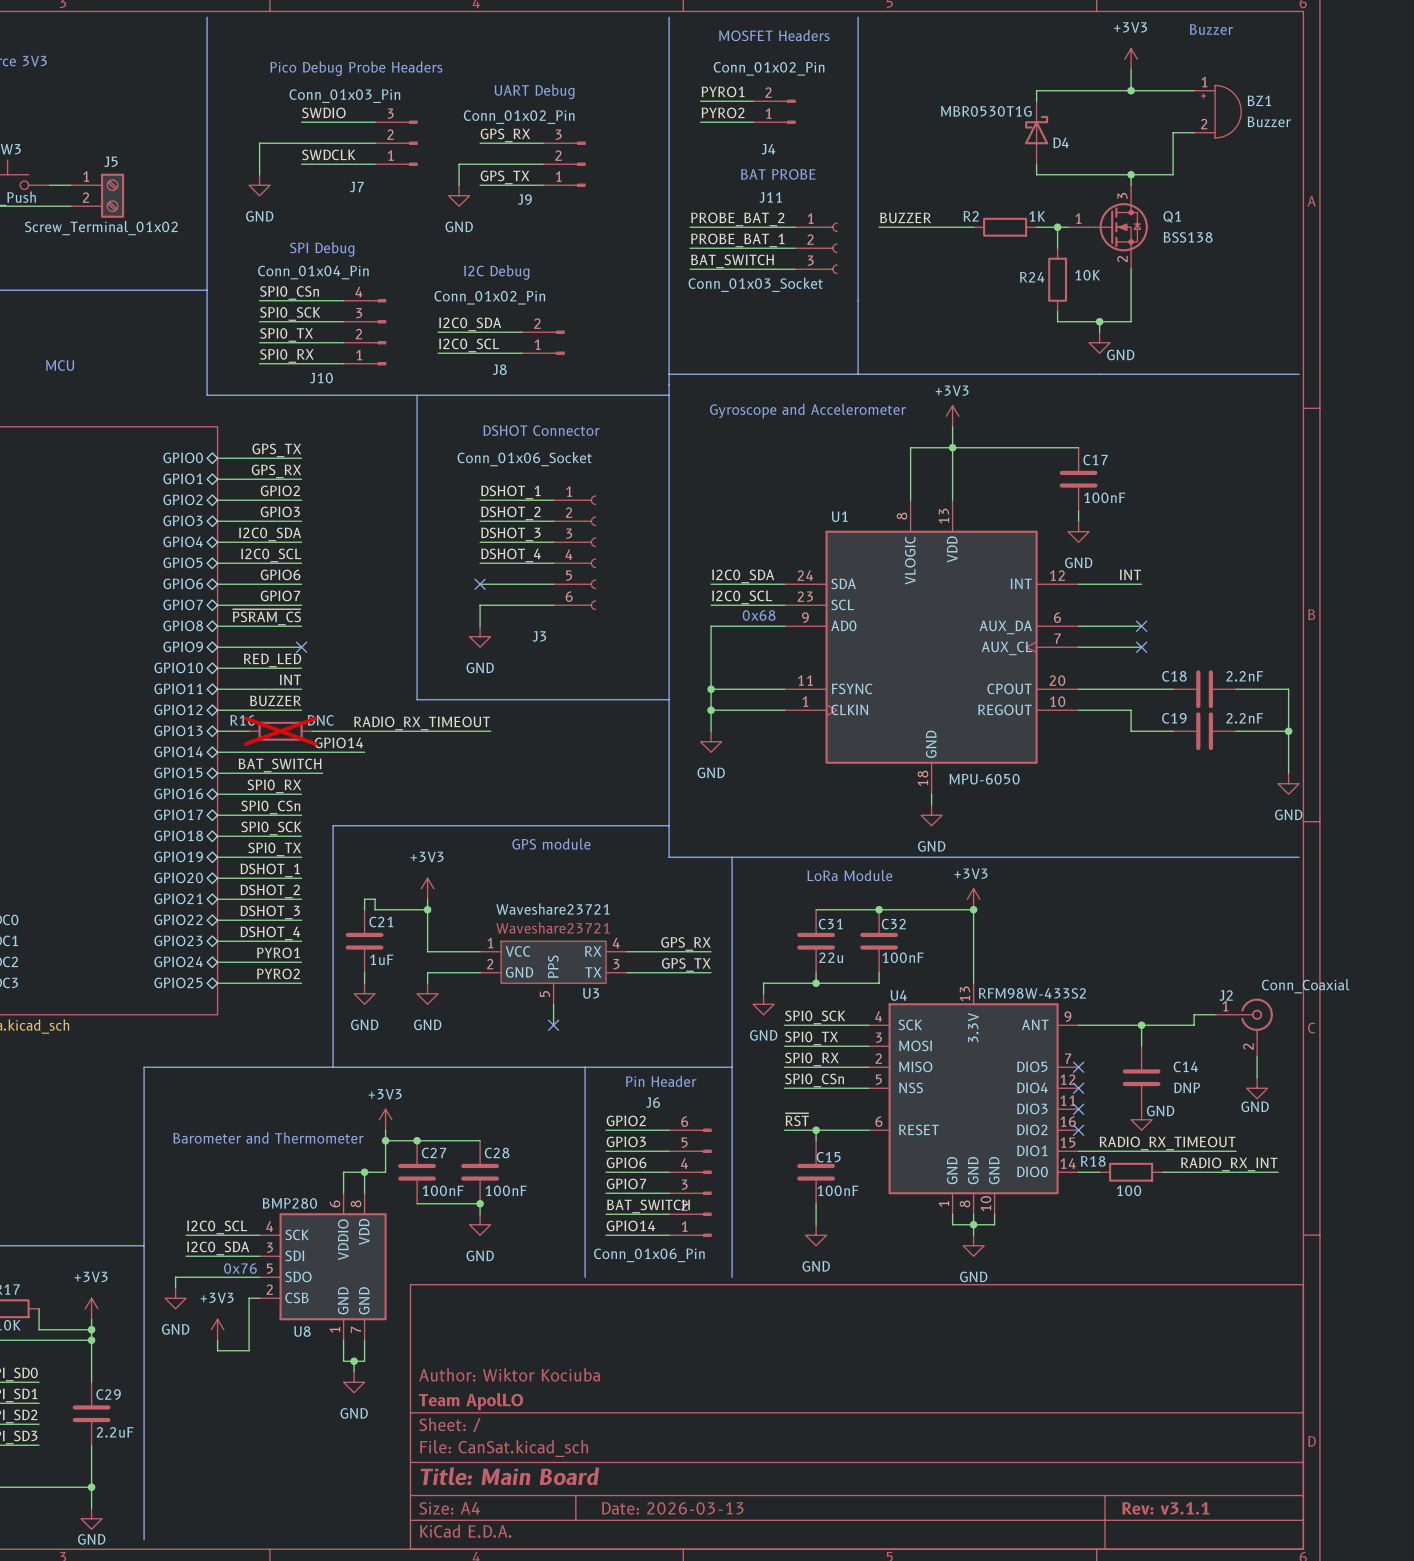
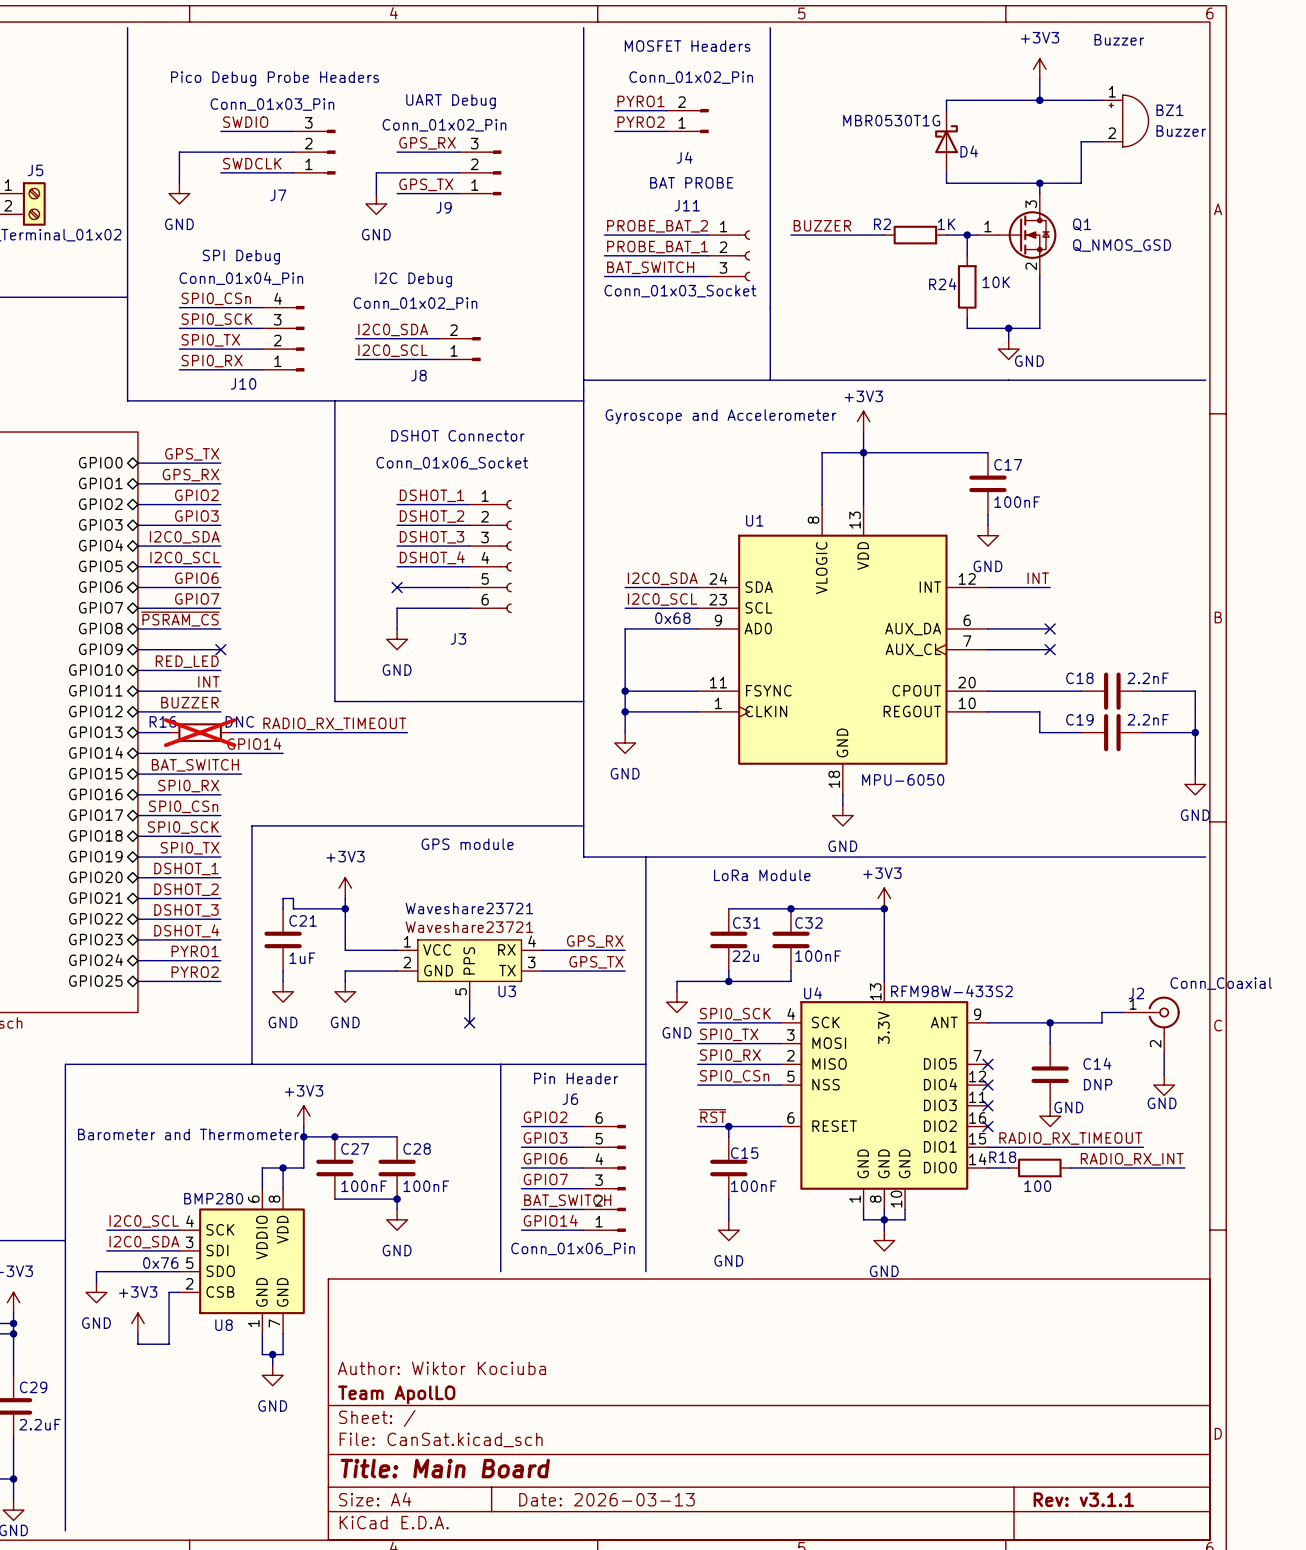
Q1 value: BSS138 (1188, 237) -> Q_NMOS_GSD (1122, 245)

